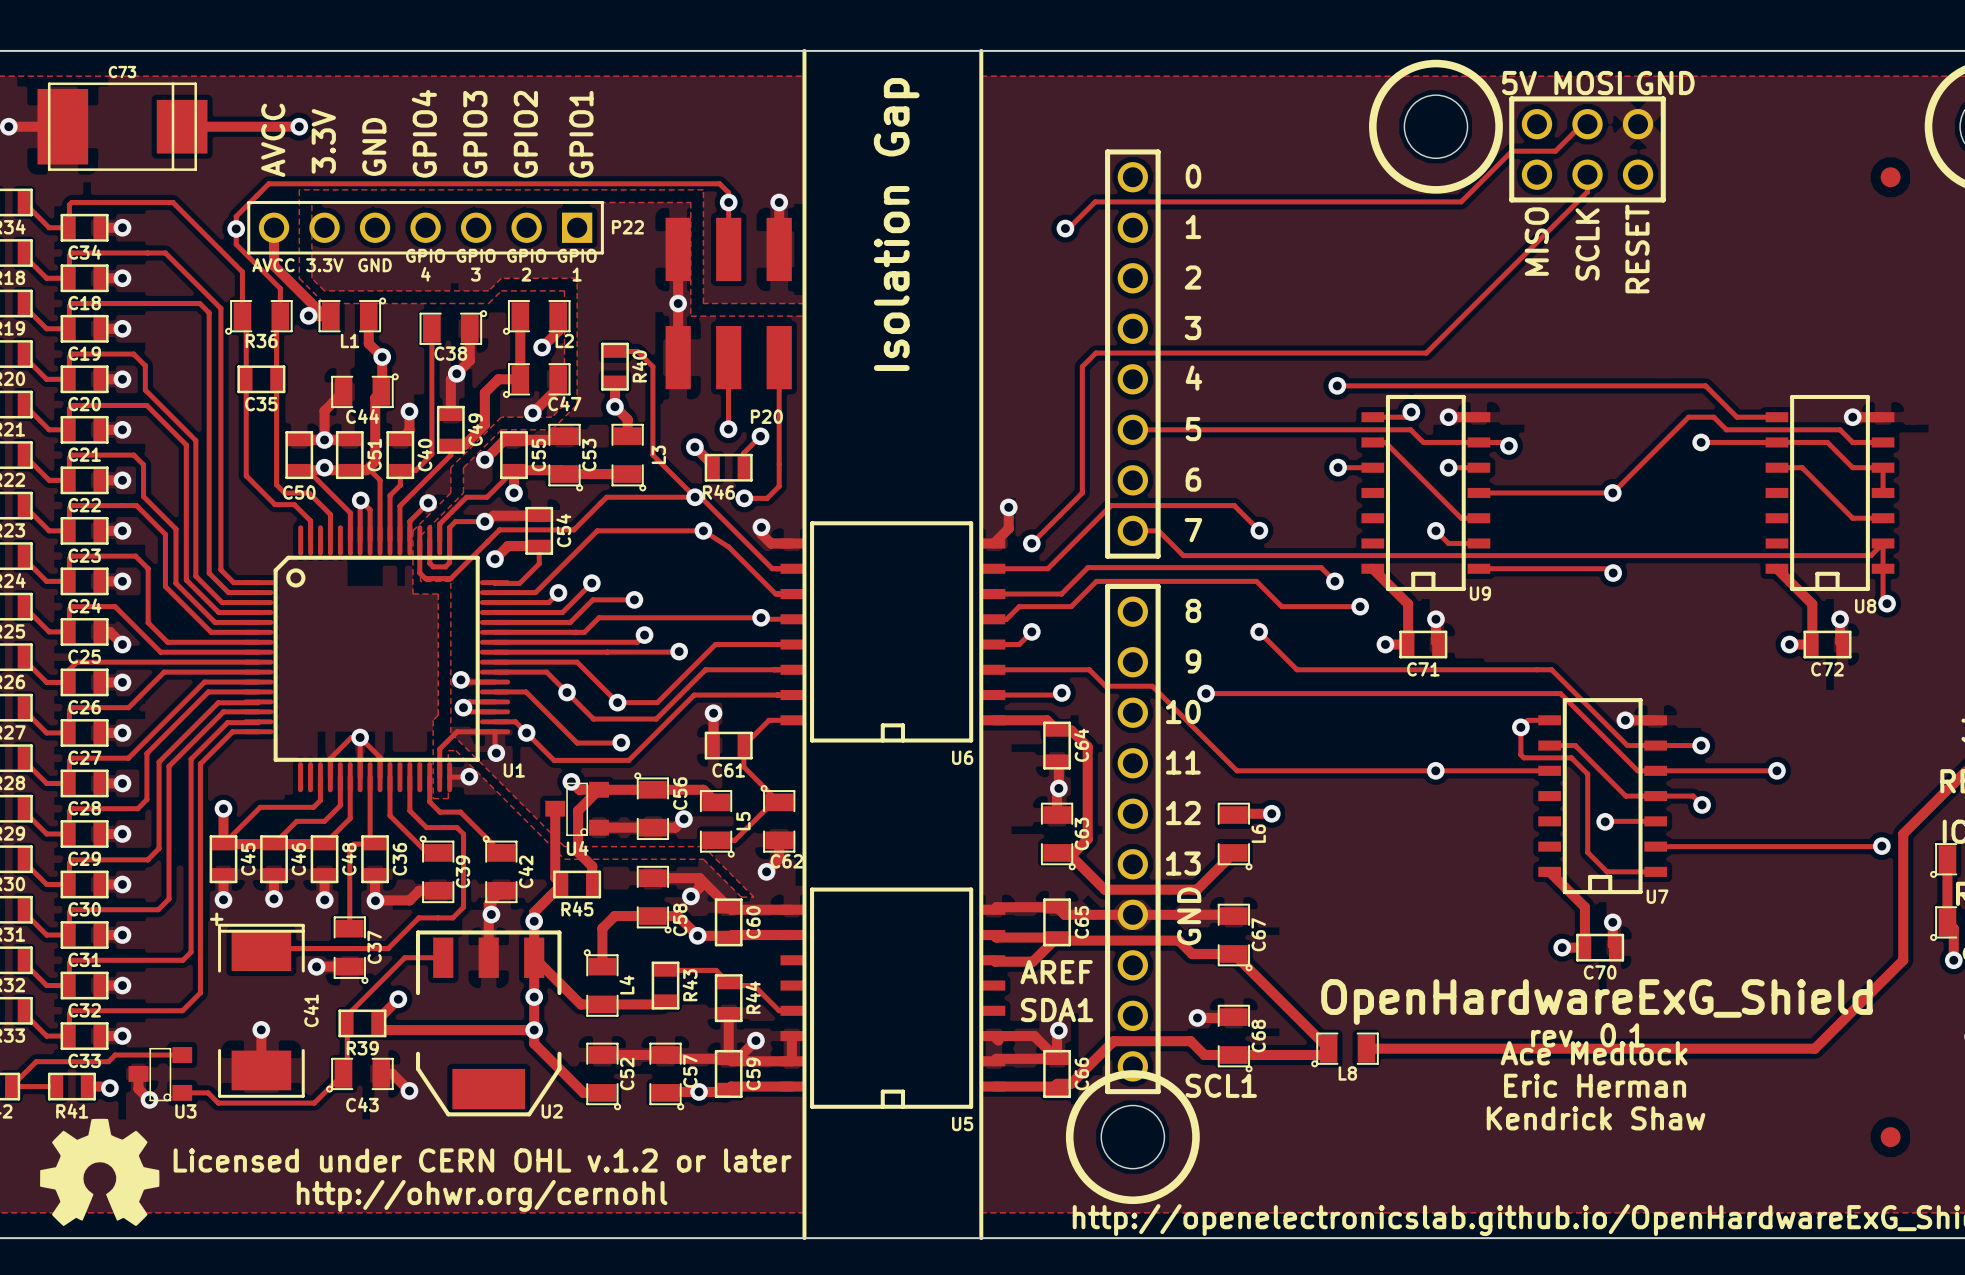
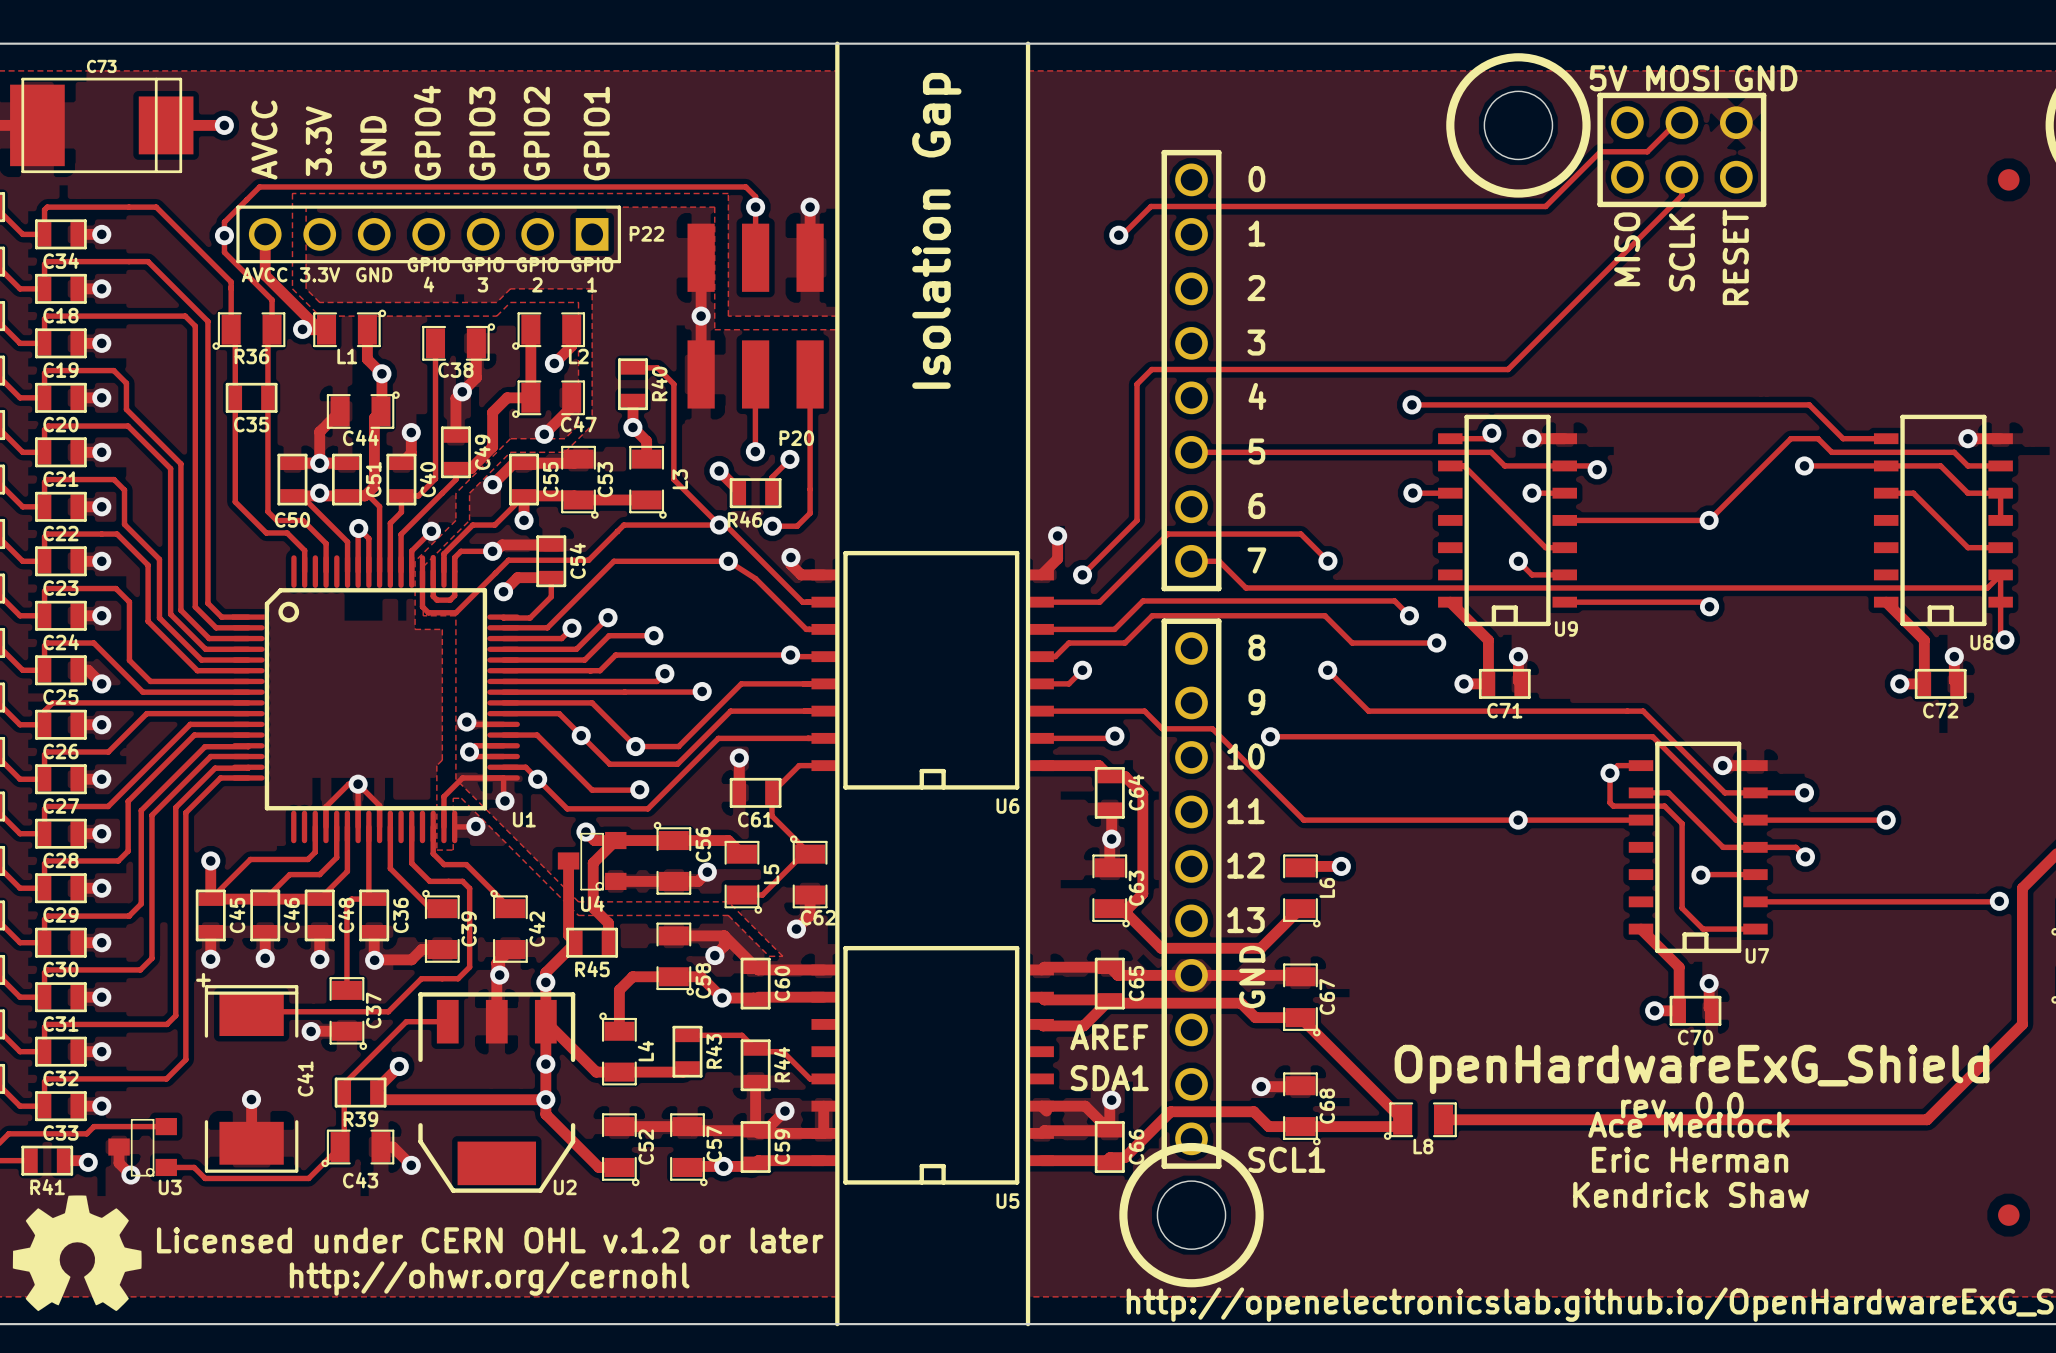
track: (236, 126) (299, 126) -> none
via position: (299, 126) -> (224, 125)
text: rev. 0.1 (1587, 1035) -> rev. 0.0 (1682, 1105)

